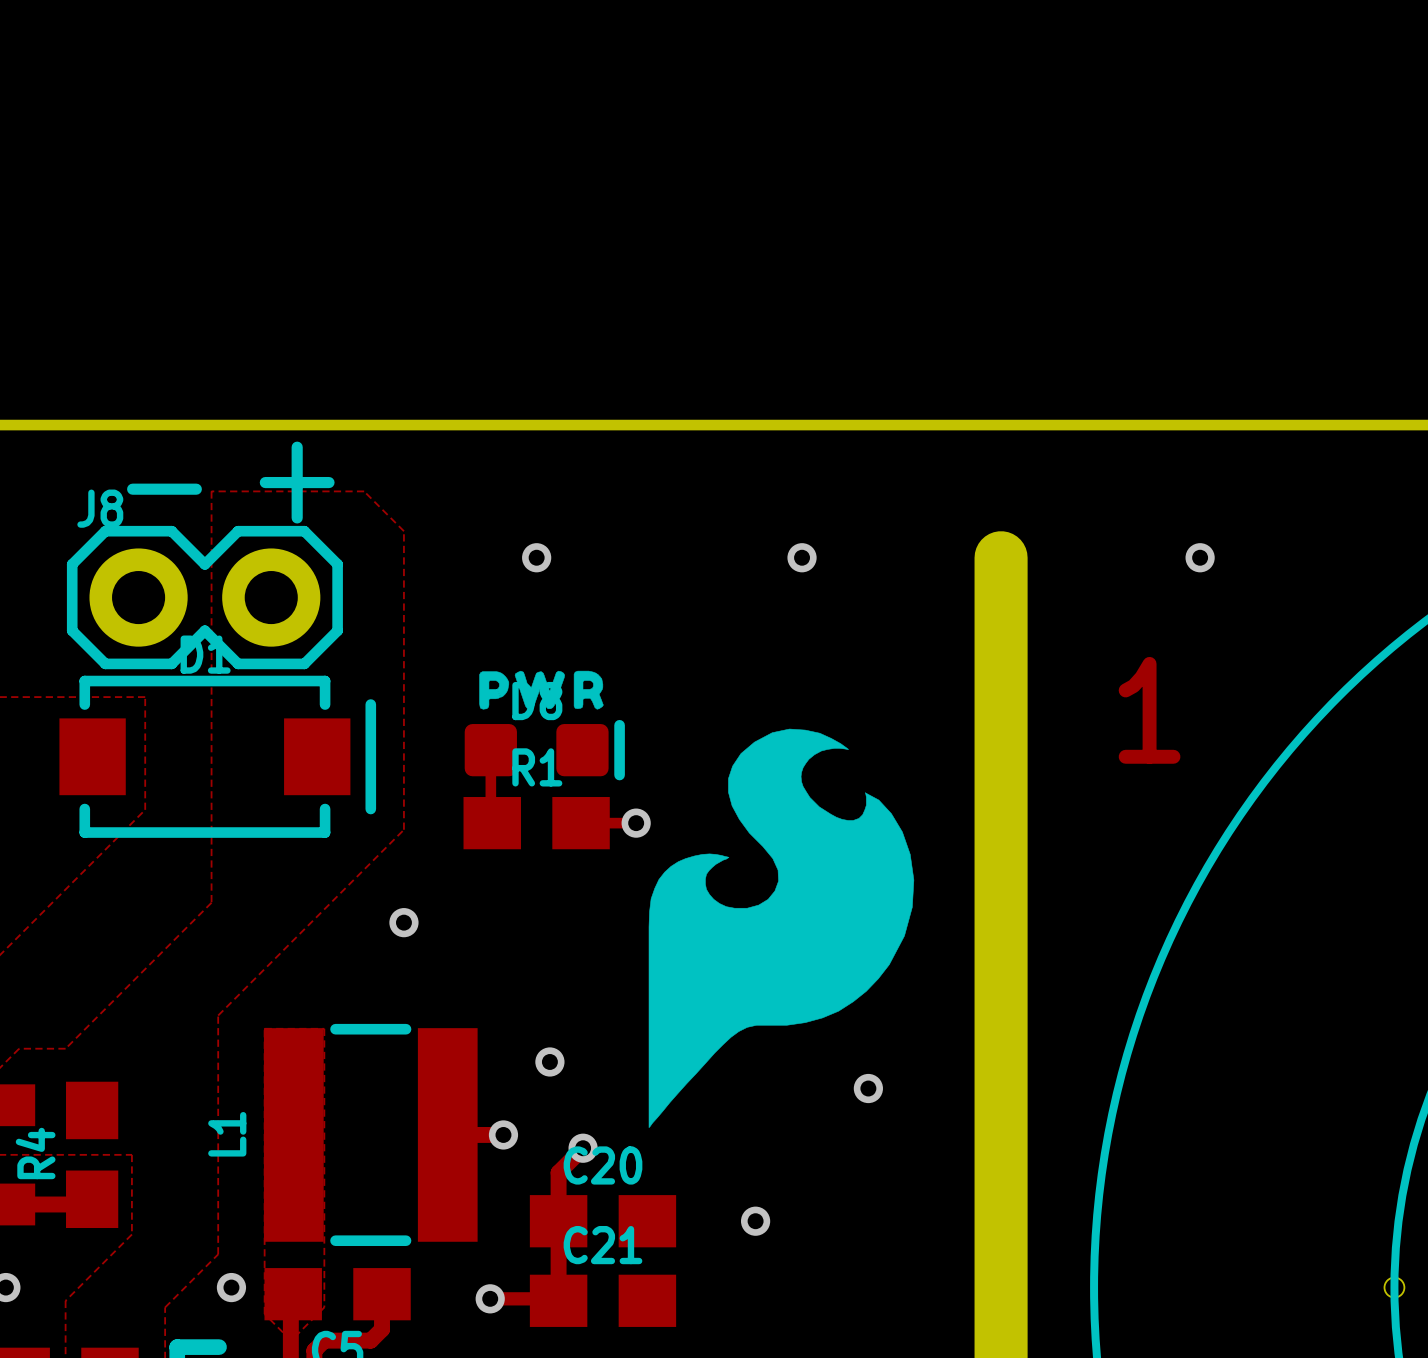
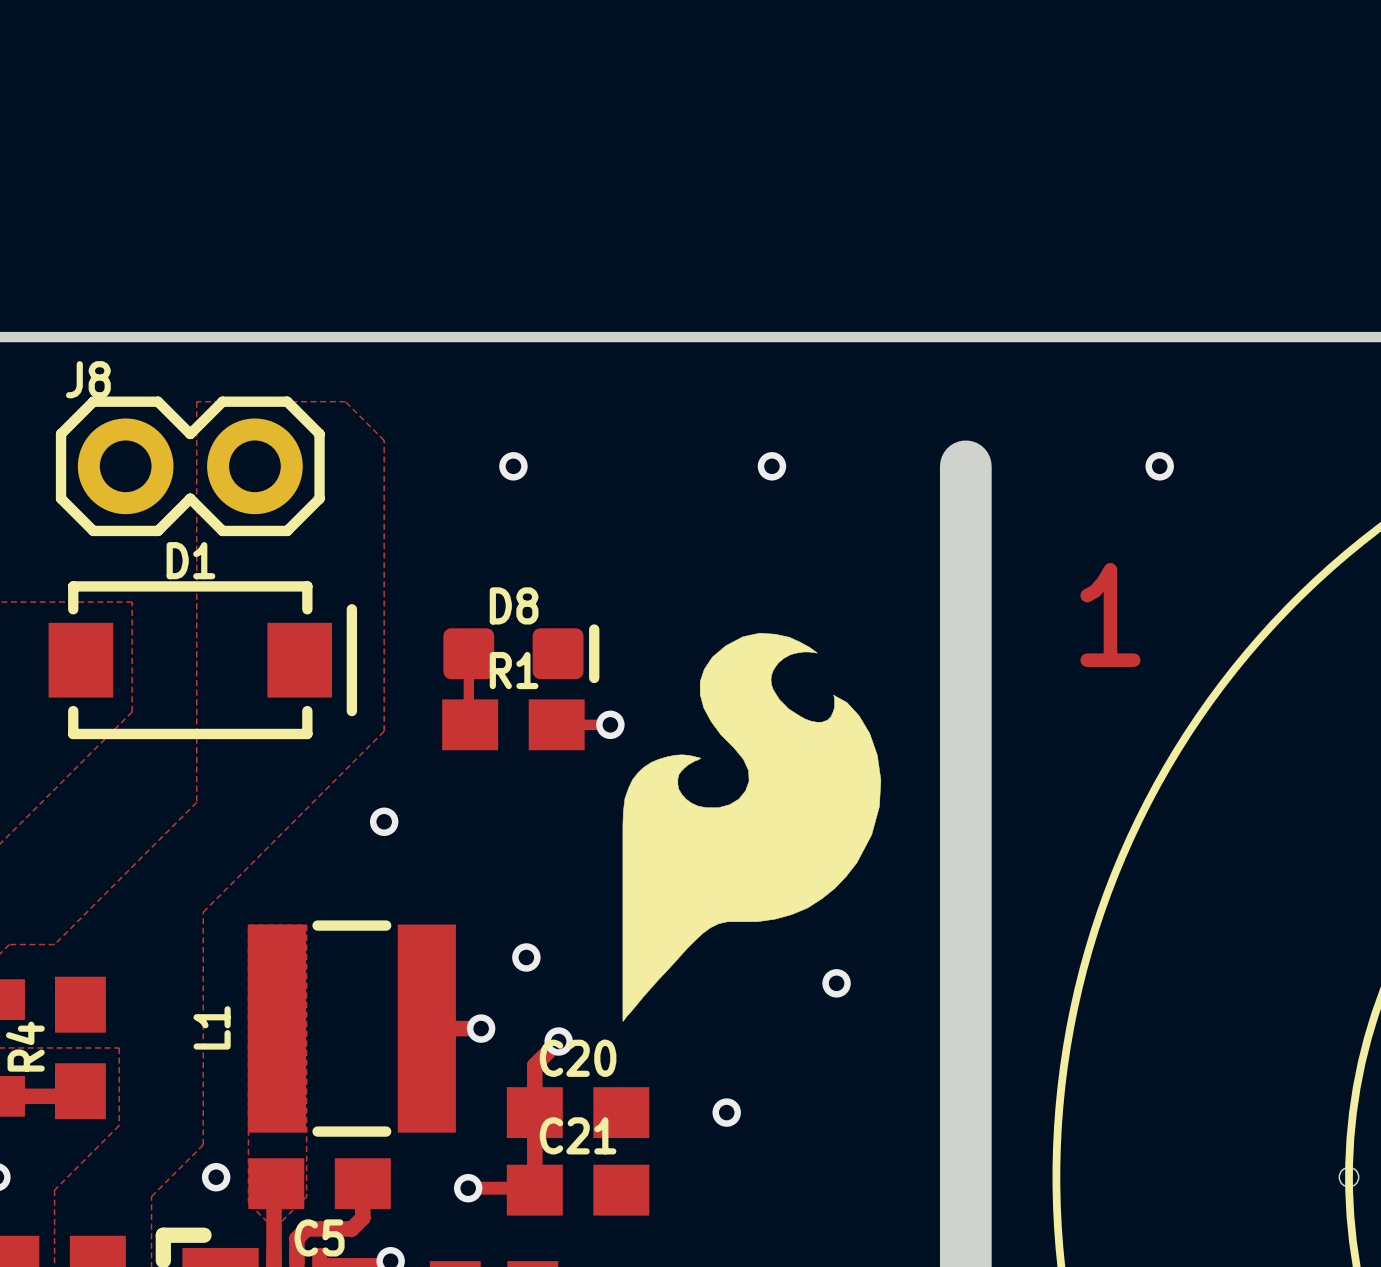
text: + (297, 482) -> none
text: - (164, 489) -> none
J8 position: (204, 597) -> (190, 466)
drawing: [479, 670, 604, 710] -> none

